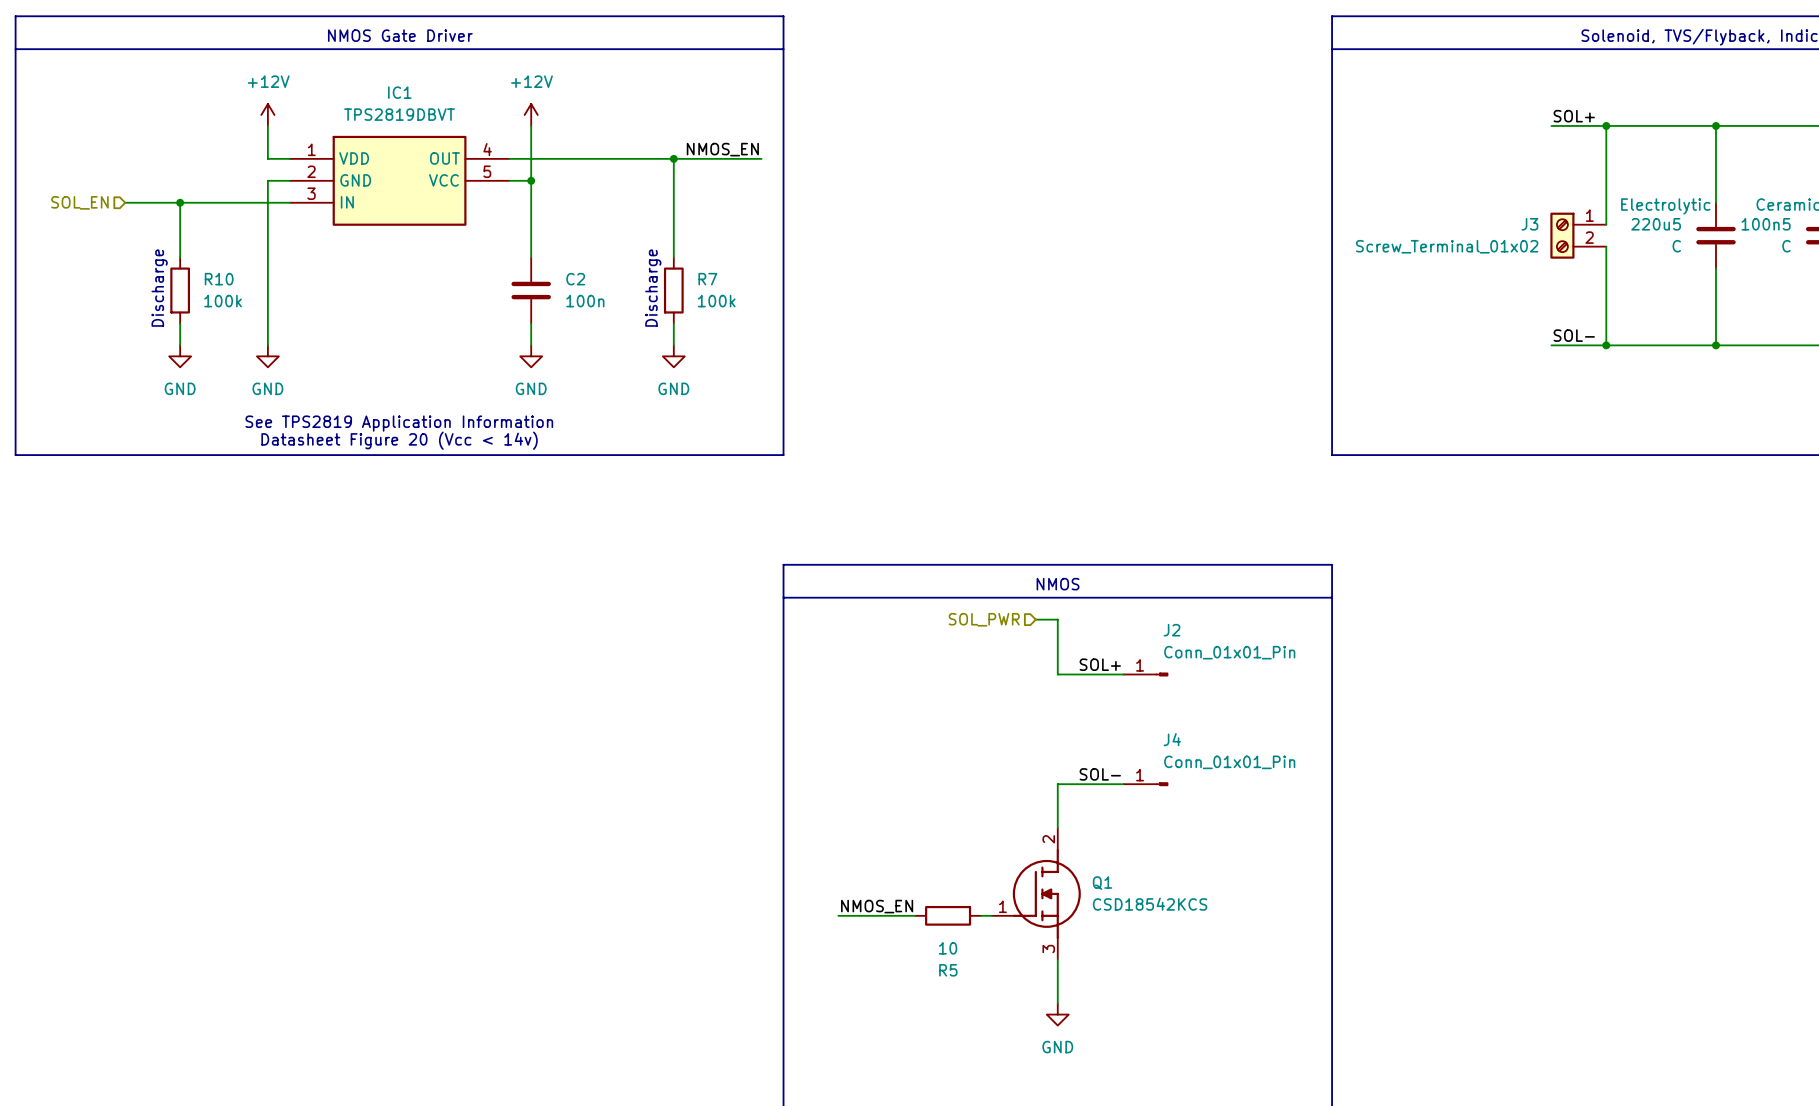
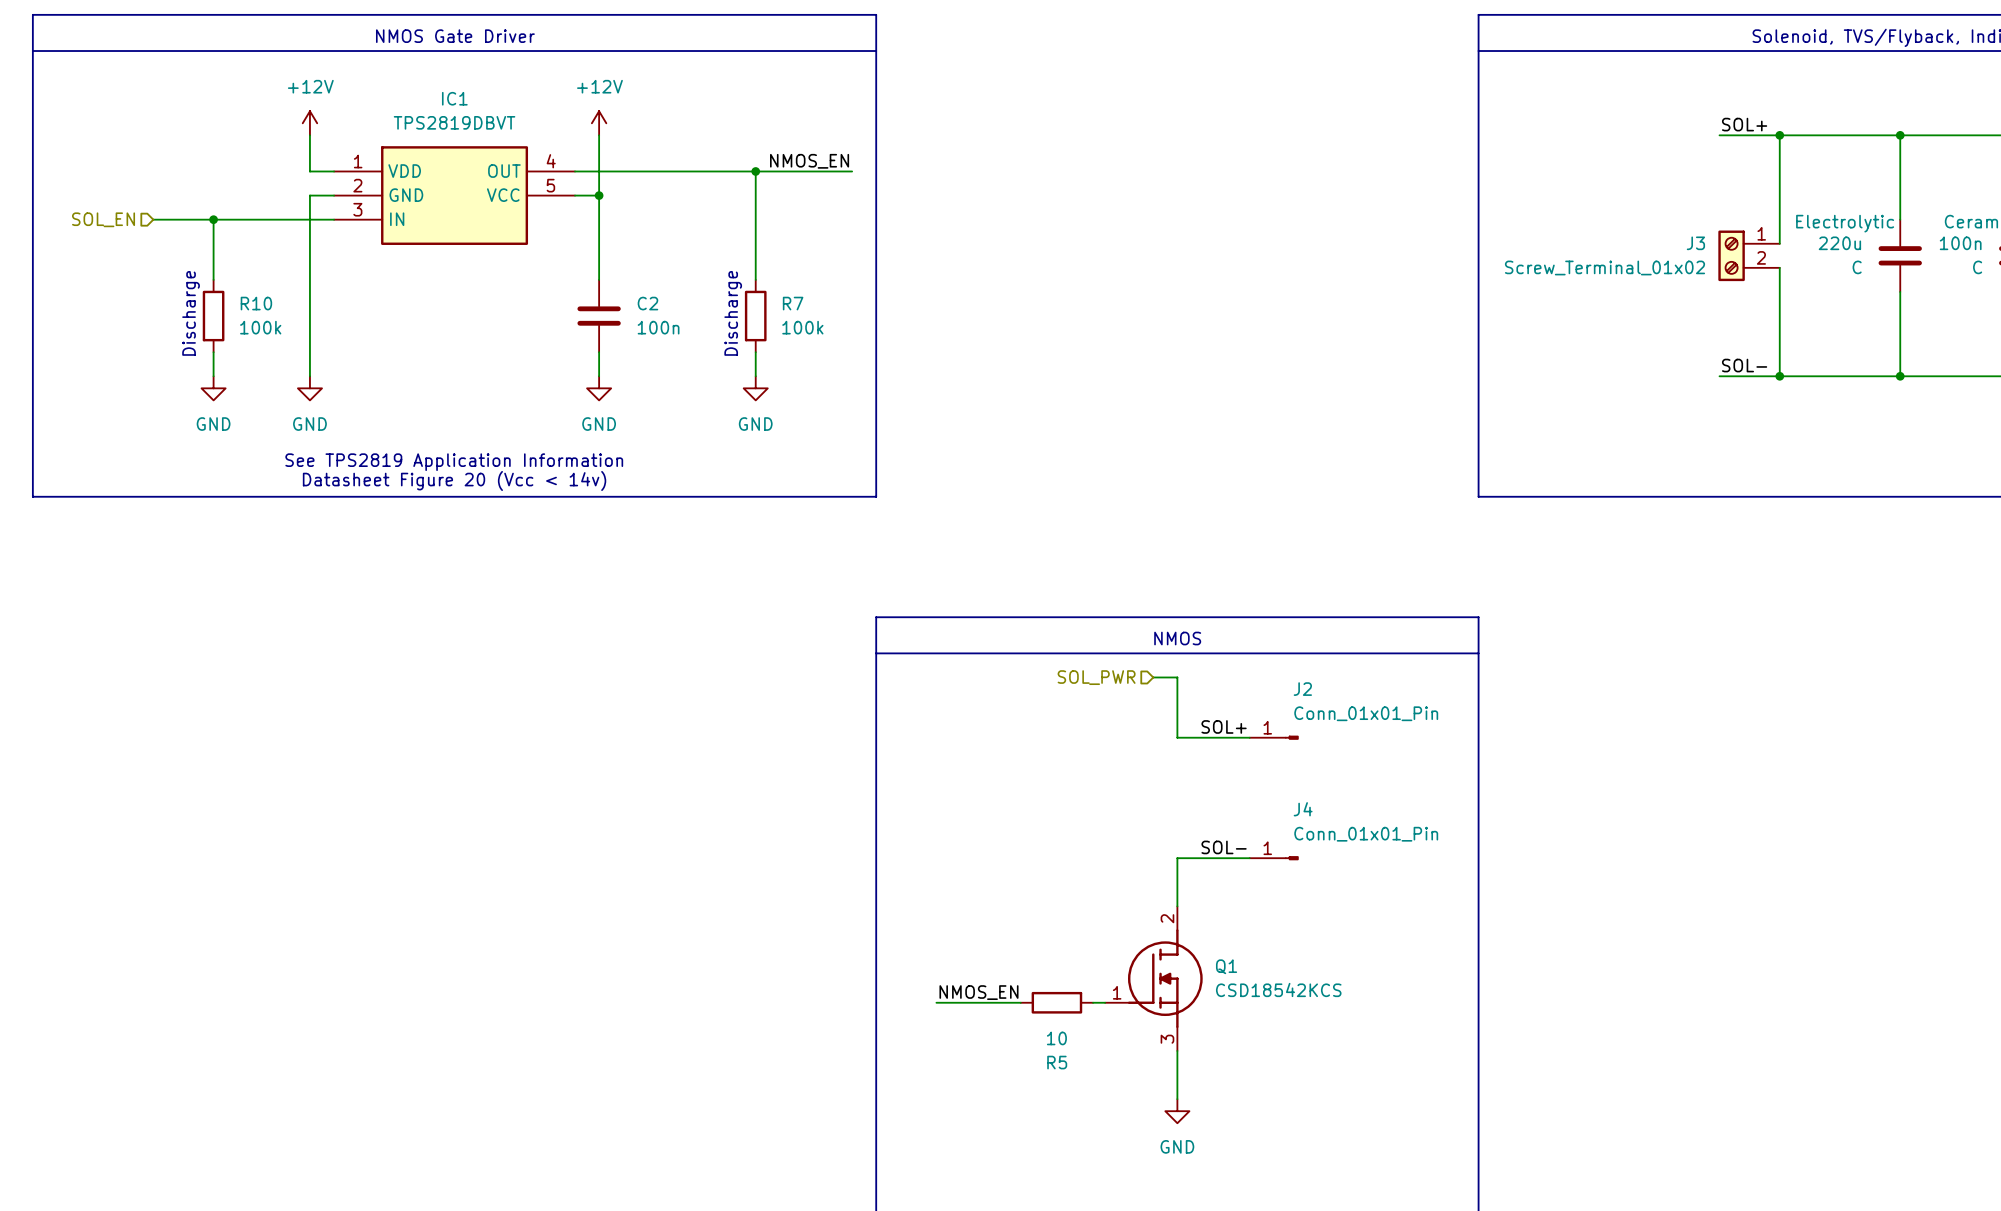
220u5 name: 220u5 (1656, 224) -> 220u (1839, 243)
100n5 name: 100n5 (1766, 224) -> 100n (1960, 243)

